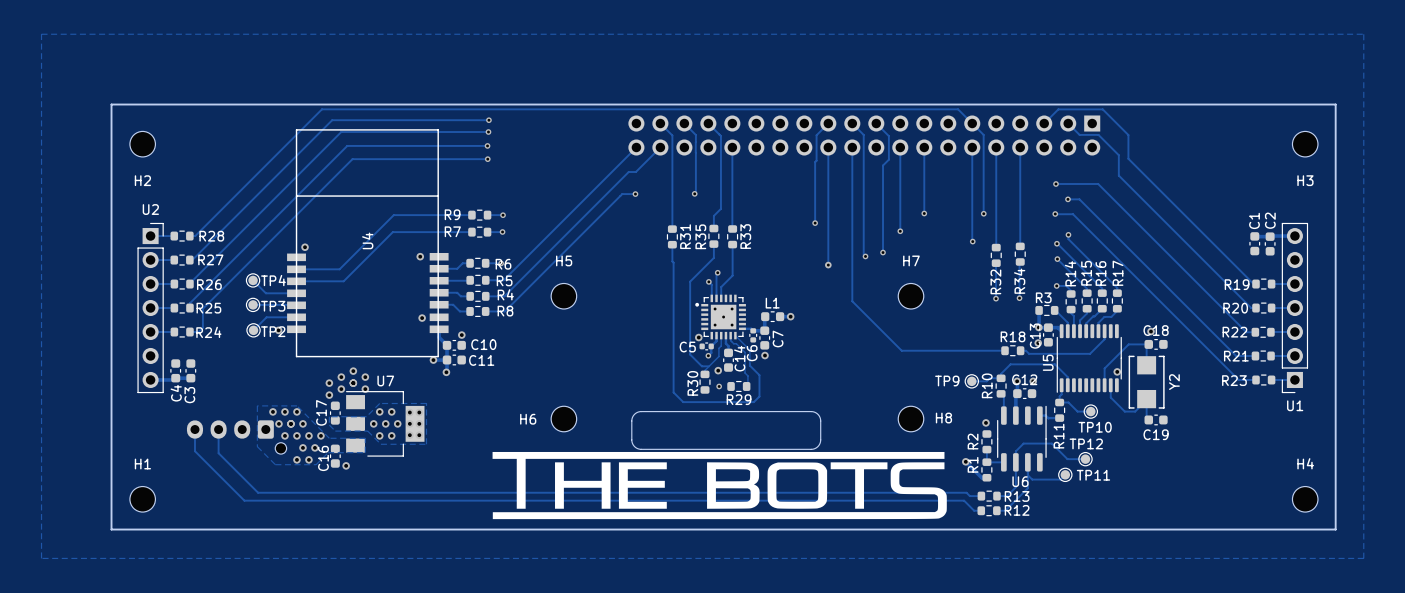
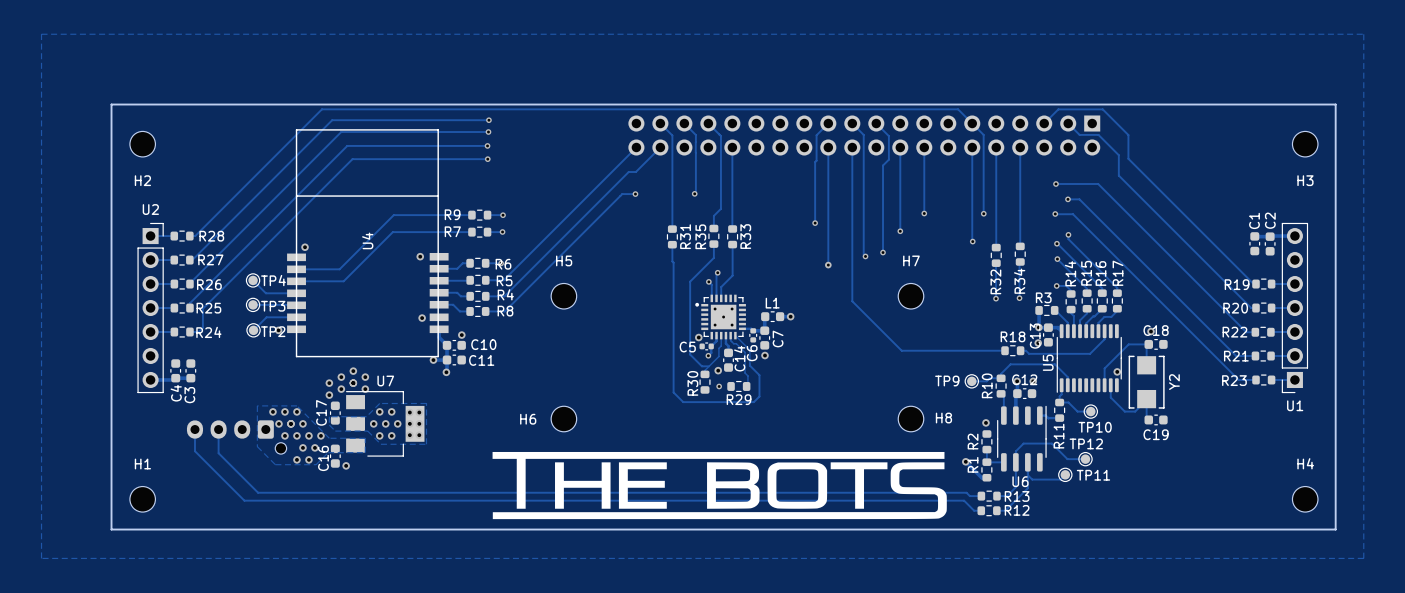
board edge: (641, 411) (812, 411) (817, 414) (820, 418) (820, 440) (817, 446) (811, 449) (640, 449) (632, 443) (631, 421) (634, 414) (641, 411) -> none

